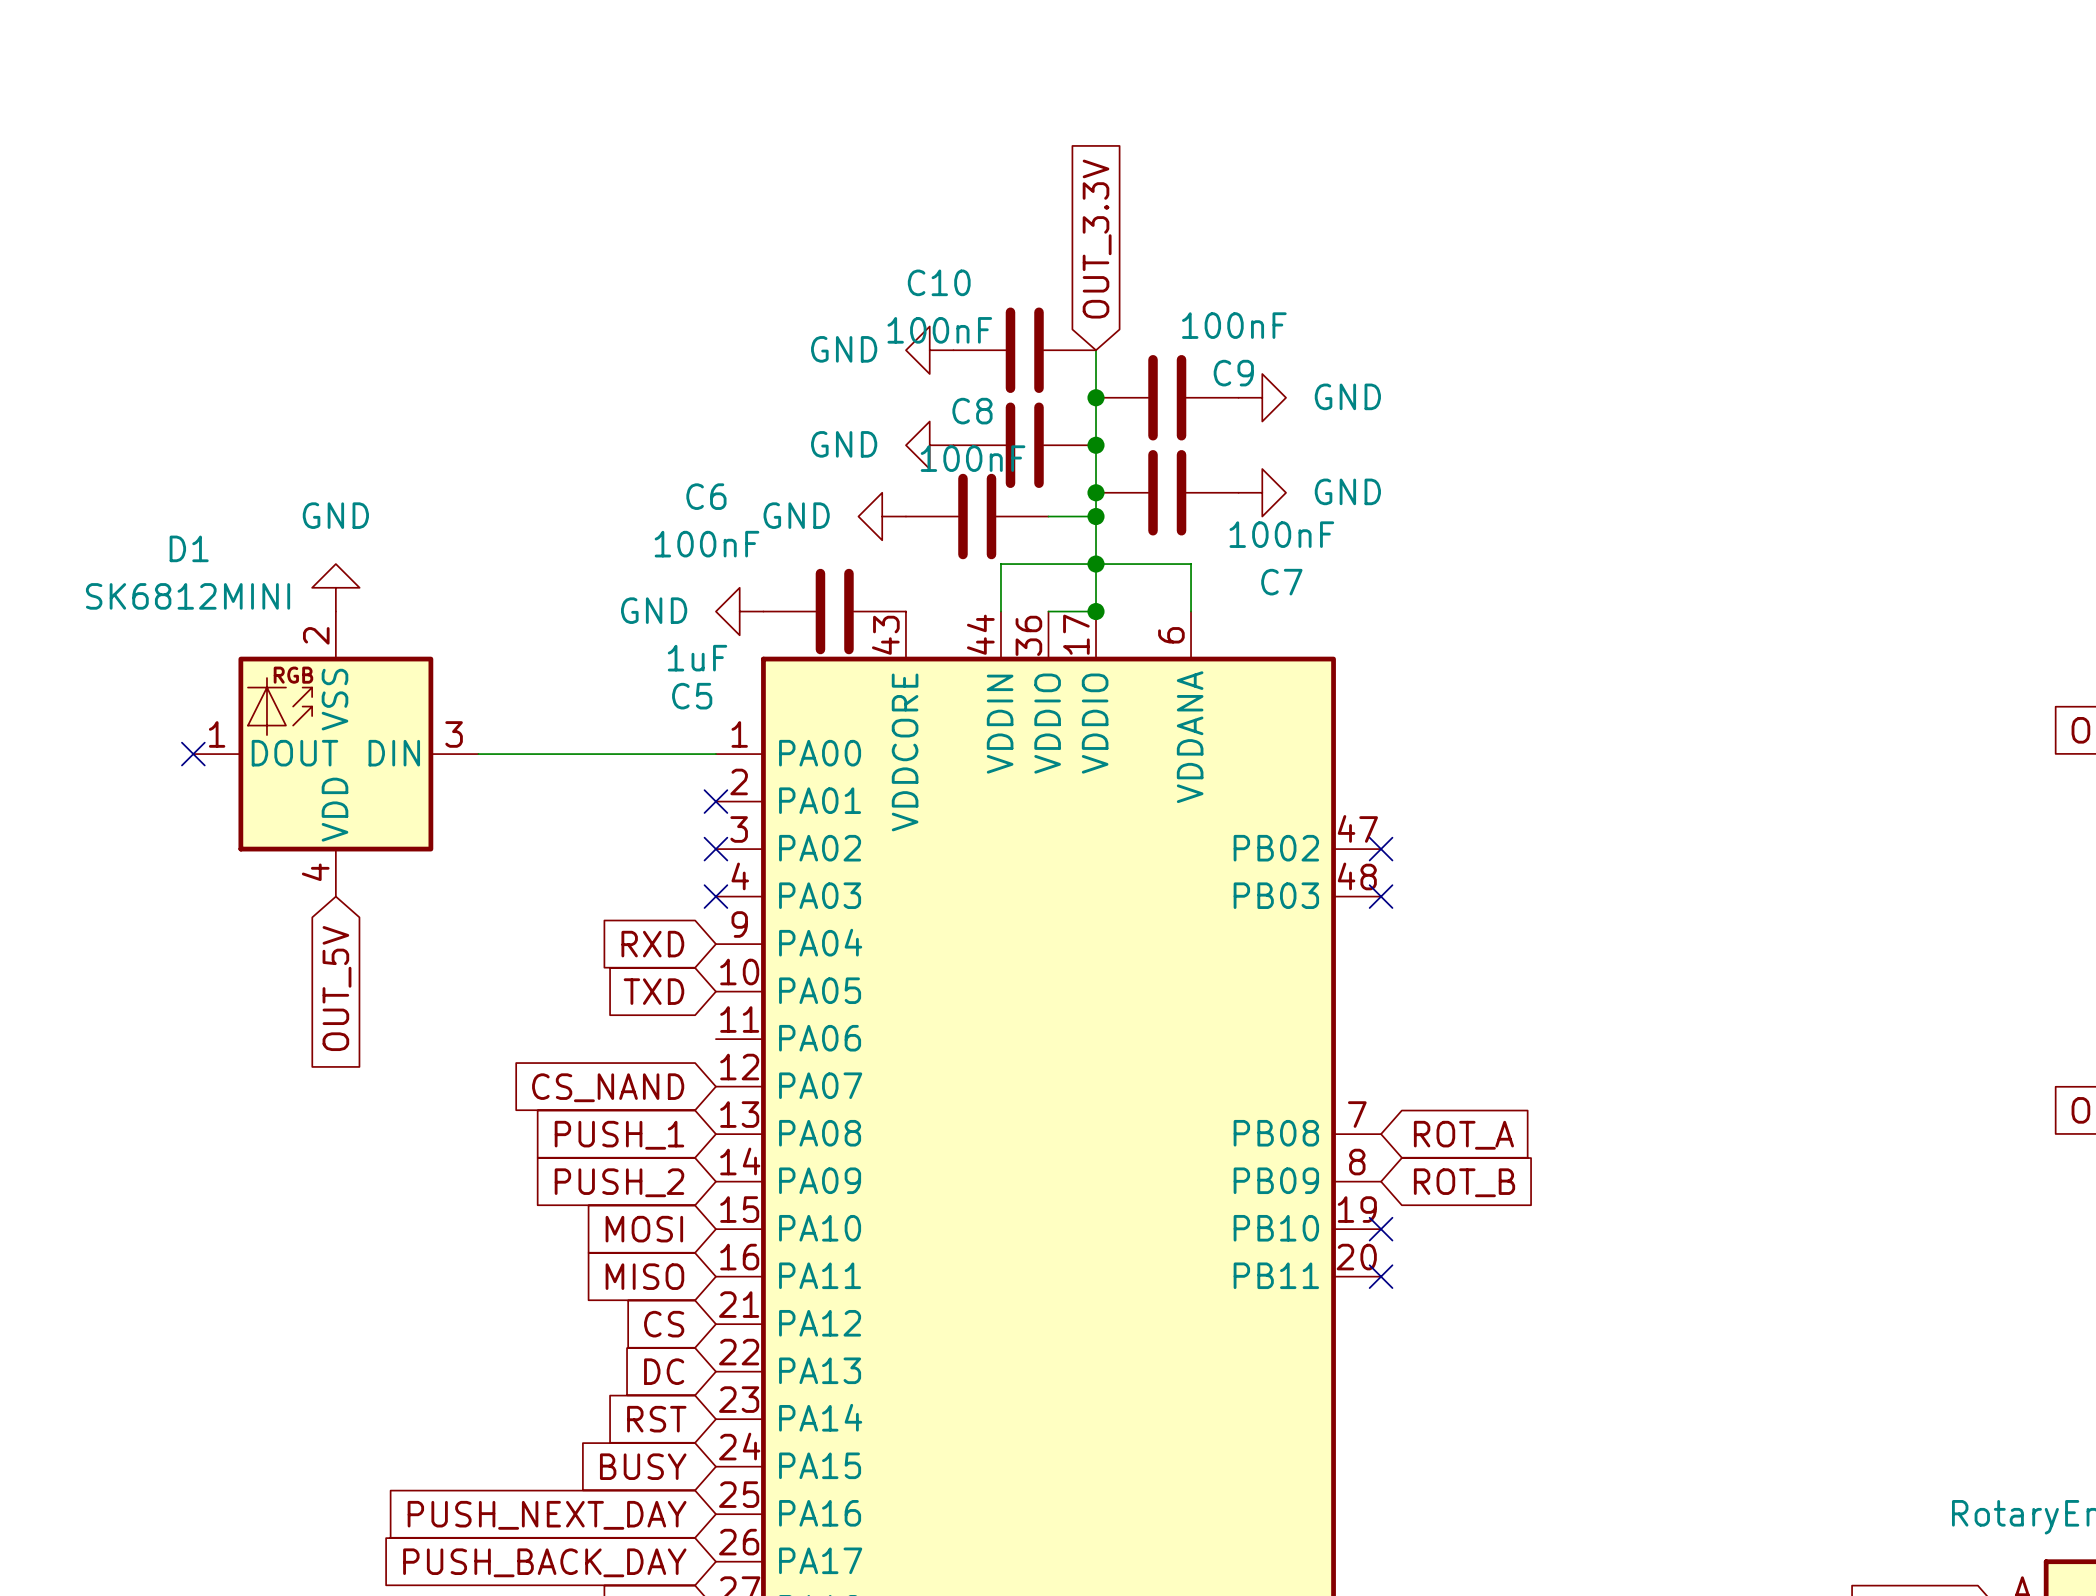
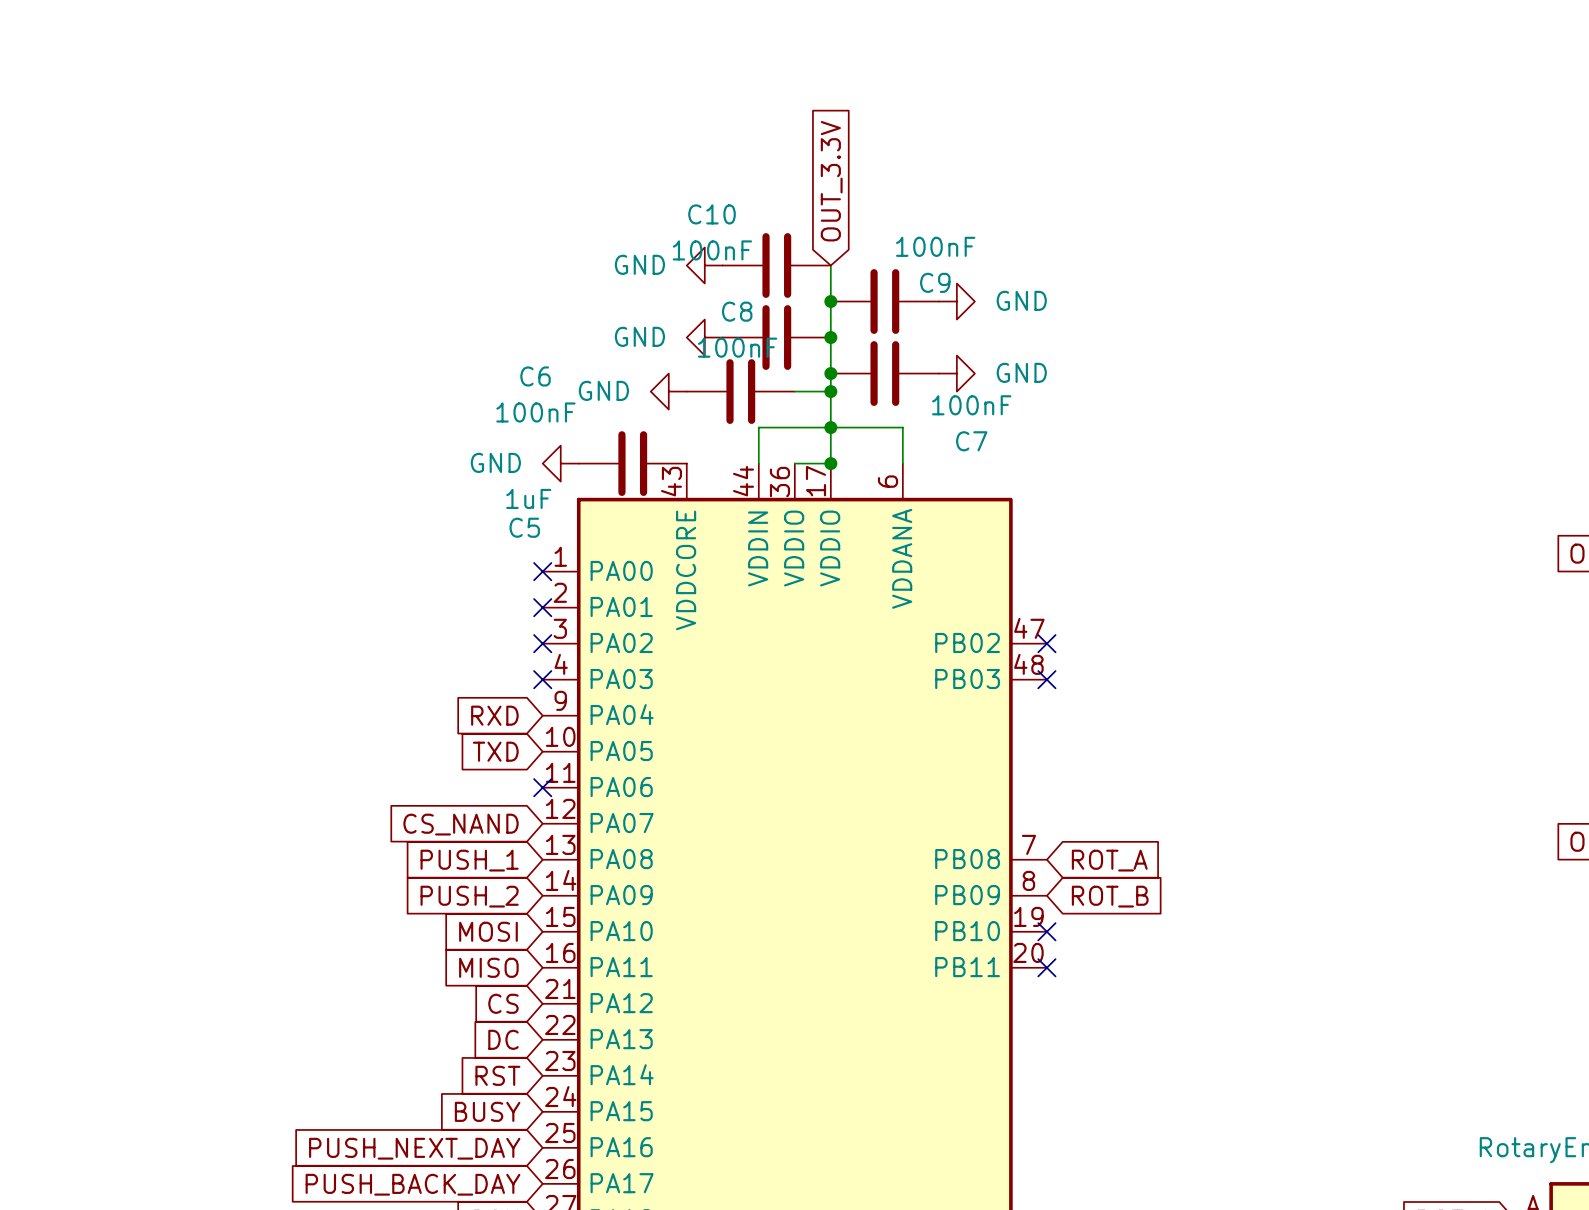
power symbol: GND (335, 587) -> none
no-connect mark: (193, 754) -> none
D1: SK6812MINI (335, 754) -> none
wire: (478, 754) (715, 754) -> none
no-connect mark: none -> (542, 571)
global label: OUT_5V (337, 988) -> none
no-connect mark: none -> (542, 787)

